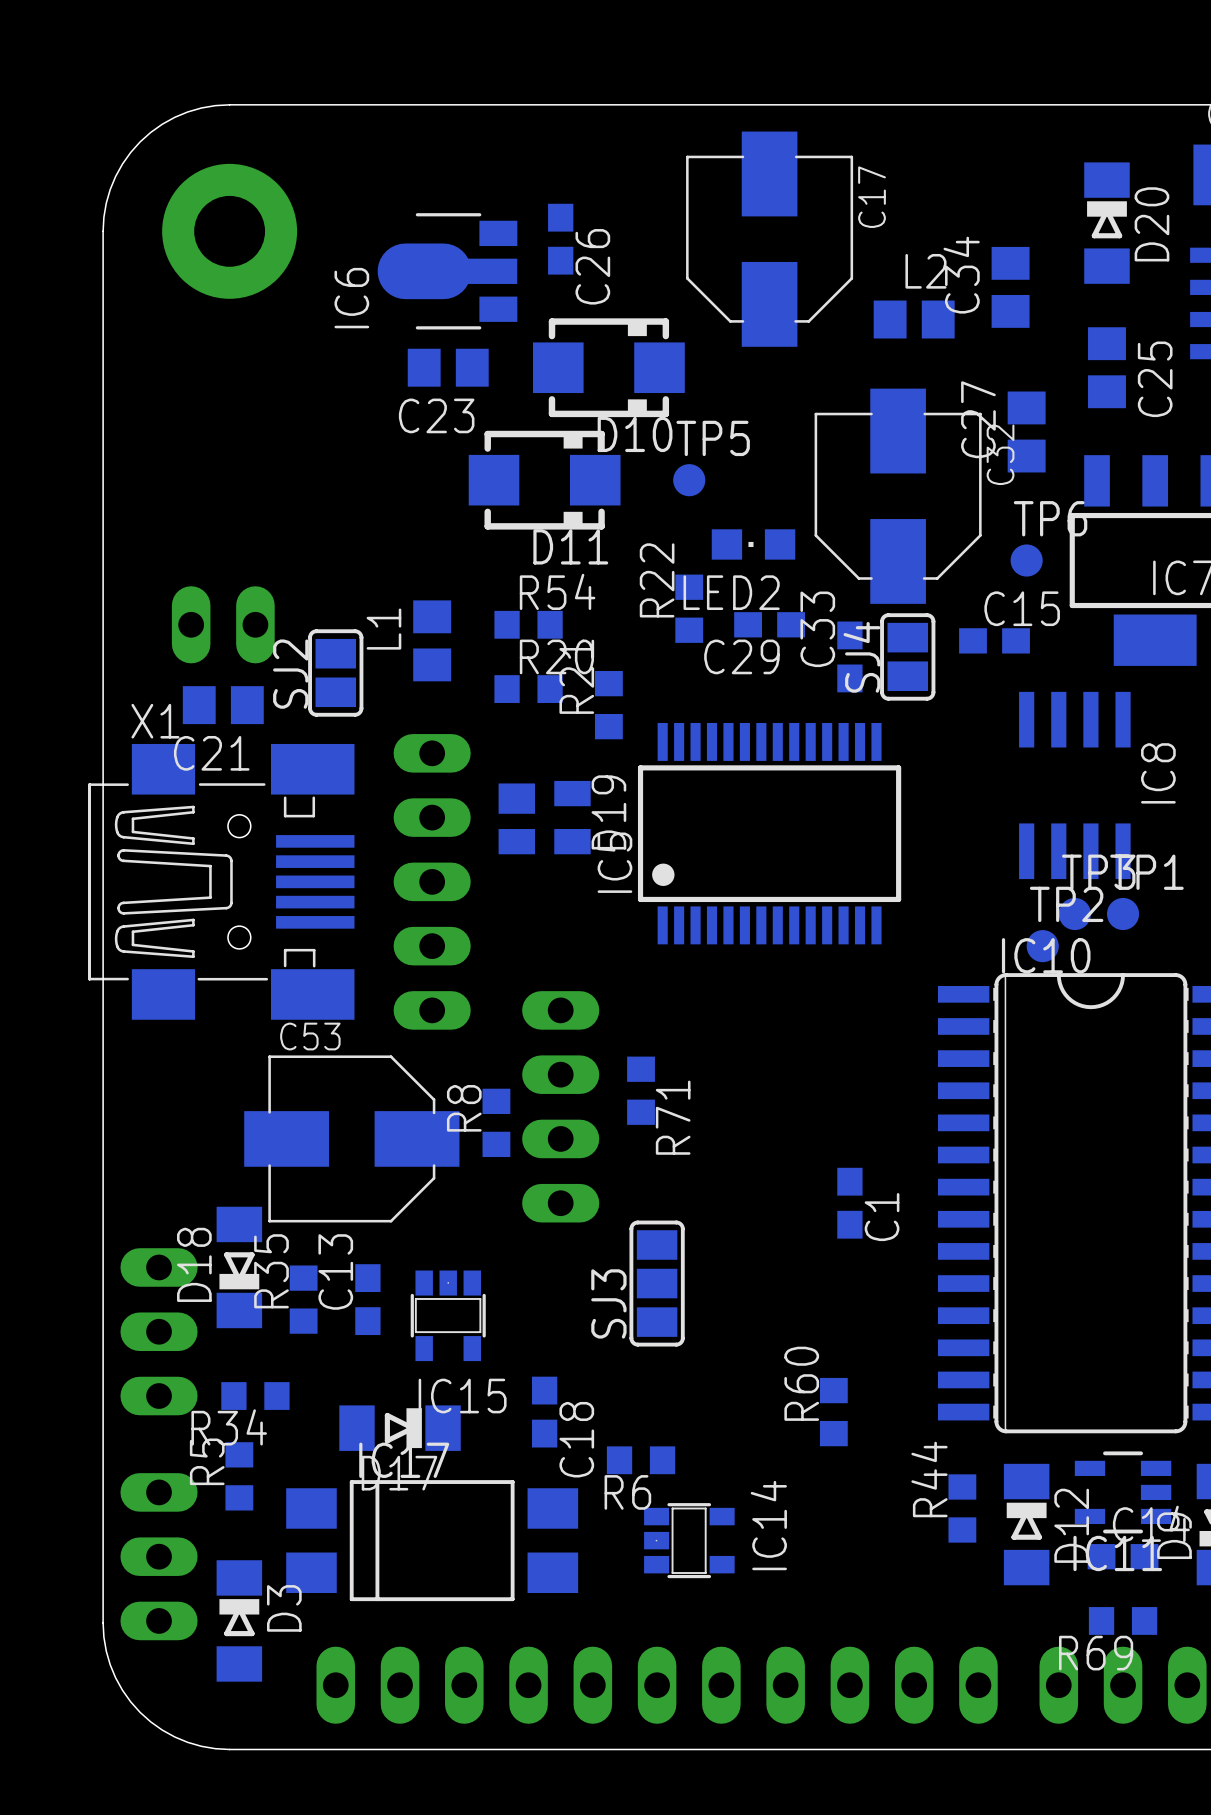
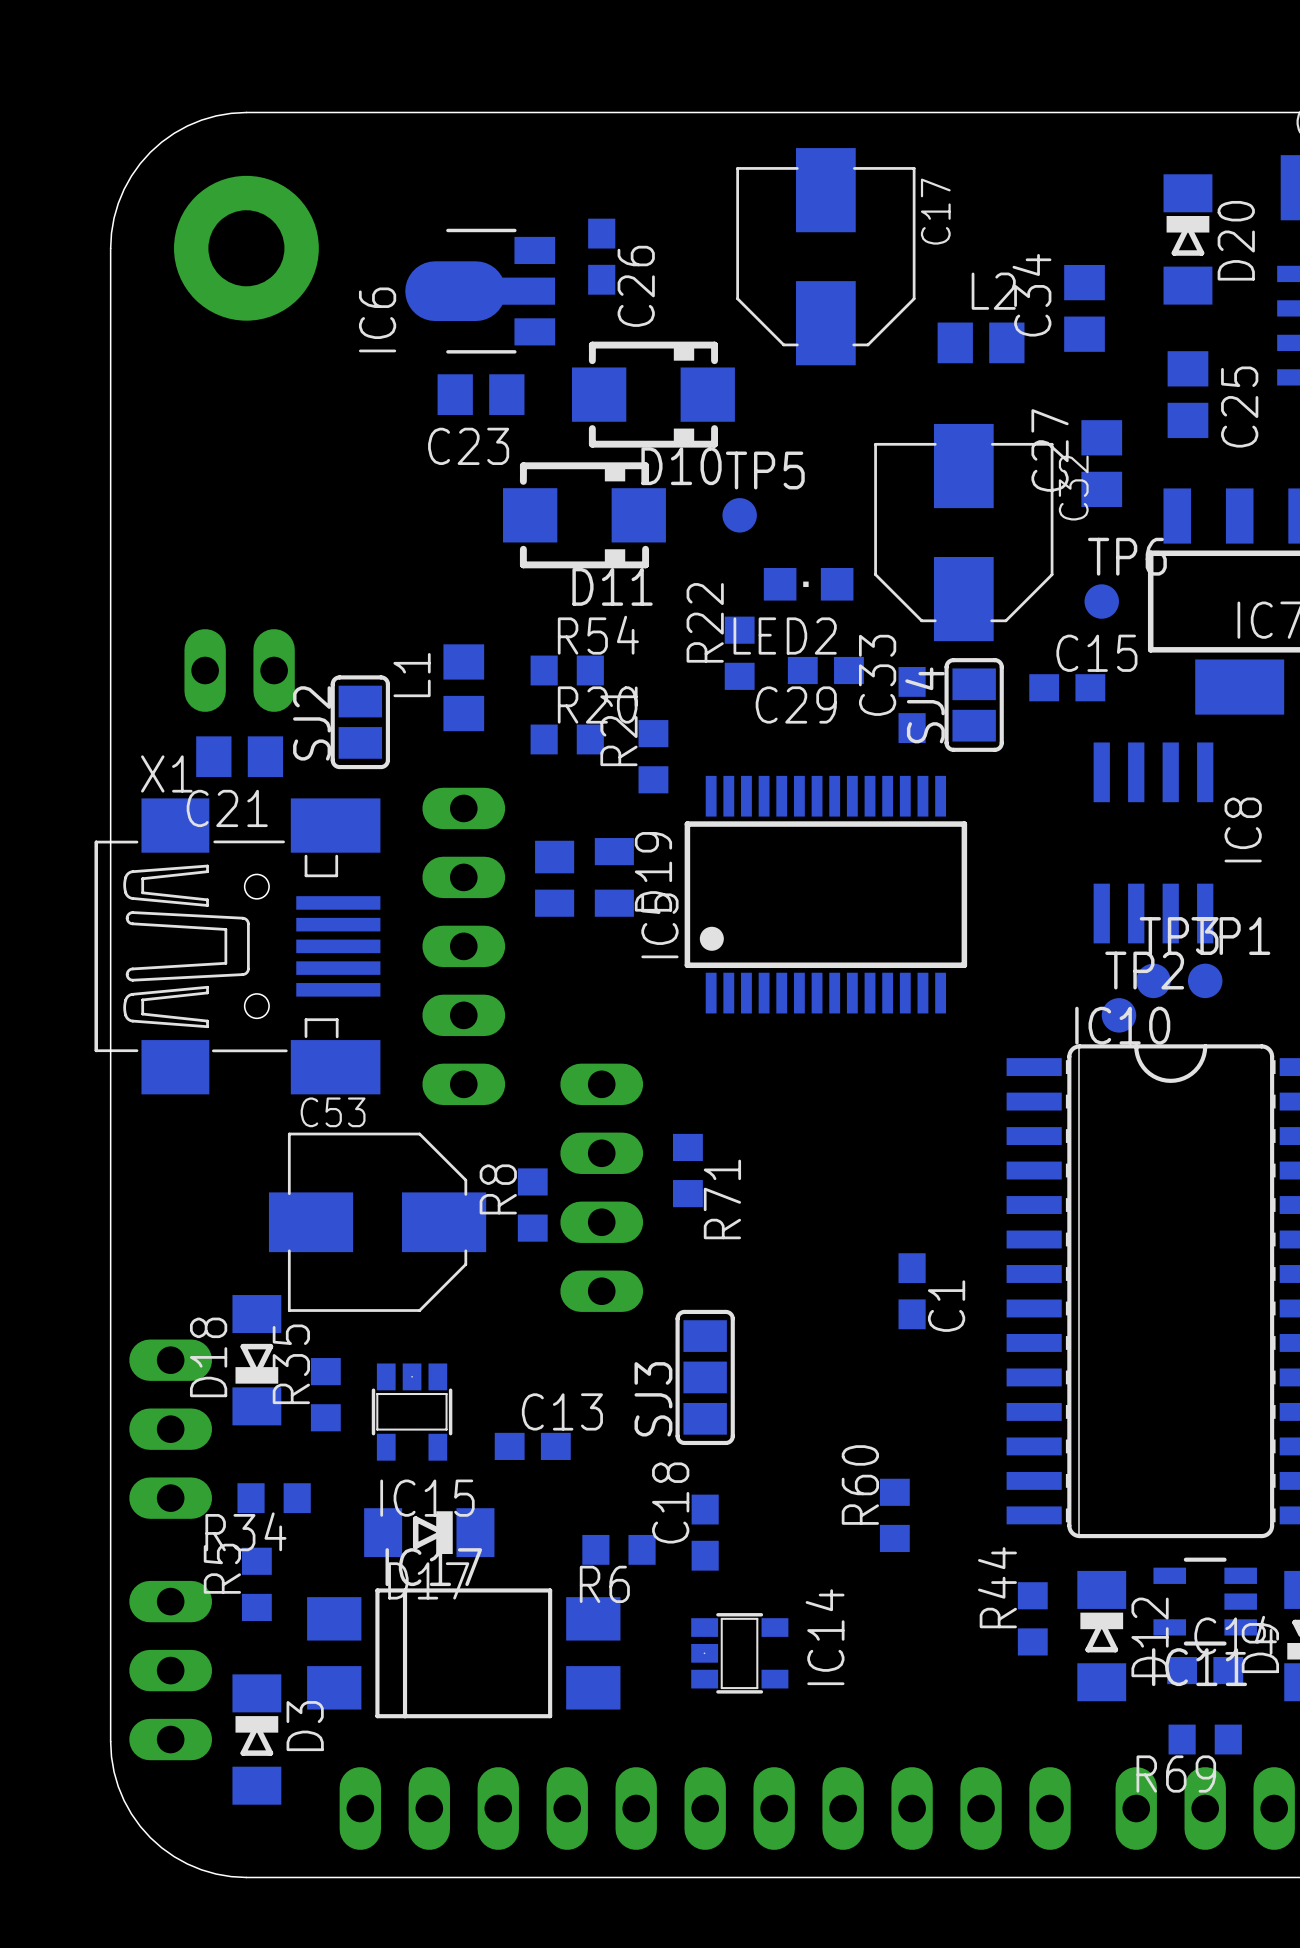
C17 footprint: [686, 131, 854, 347] -> [736, 148, 916, 366]
C32 footprint: [814, 388, 982, 604] -> [874, 423, 1054, 642]
C53 footprint: [244, 1055, 460, 1223] -> [268, 1132, 487, 1312]
C13 rotation: 0° (367, 1299) -> 90° clockwise (532, 1446)
C13 position: (367, 1299) -> (532, 1446)
IC15 position: (448, 1315) -> (412, 1412)
C18 position: (544, 1412) -> (705, 1532)
C18 name position: C18 (576, 1439) -> C18 (670, 1502)
R6 position: (641, 1460) -> (618, 1549)

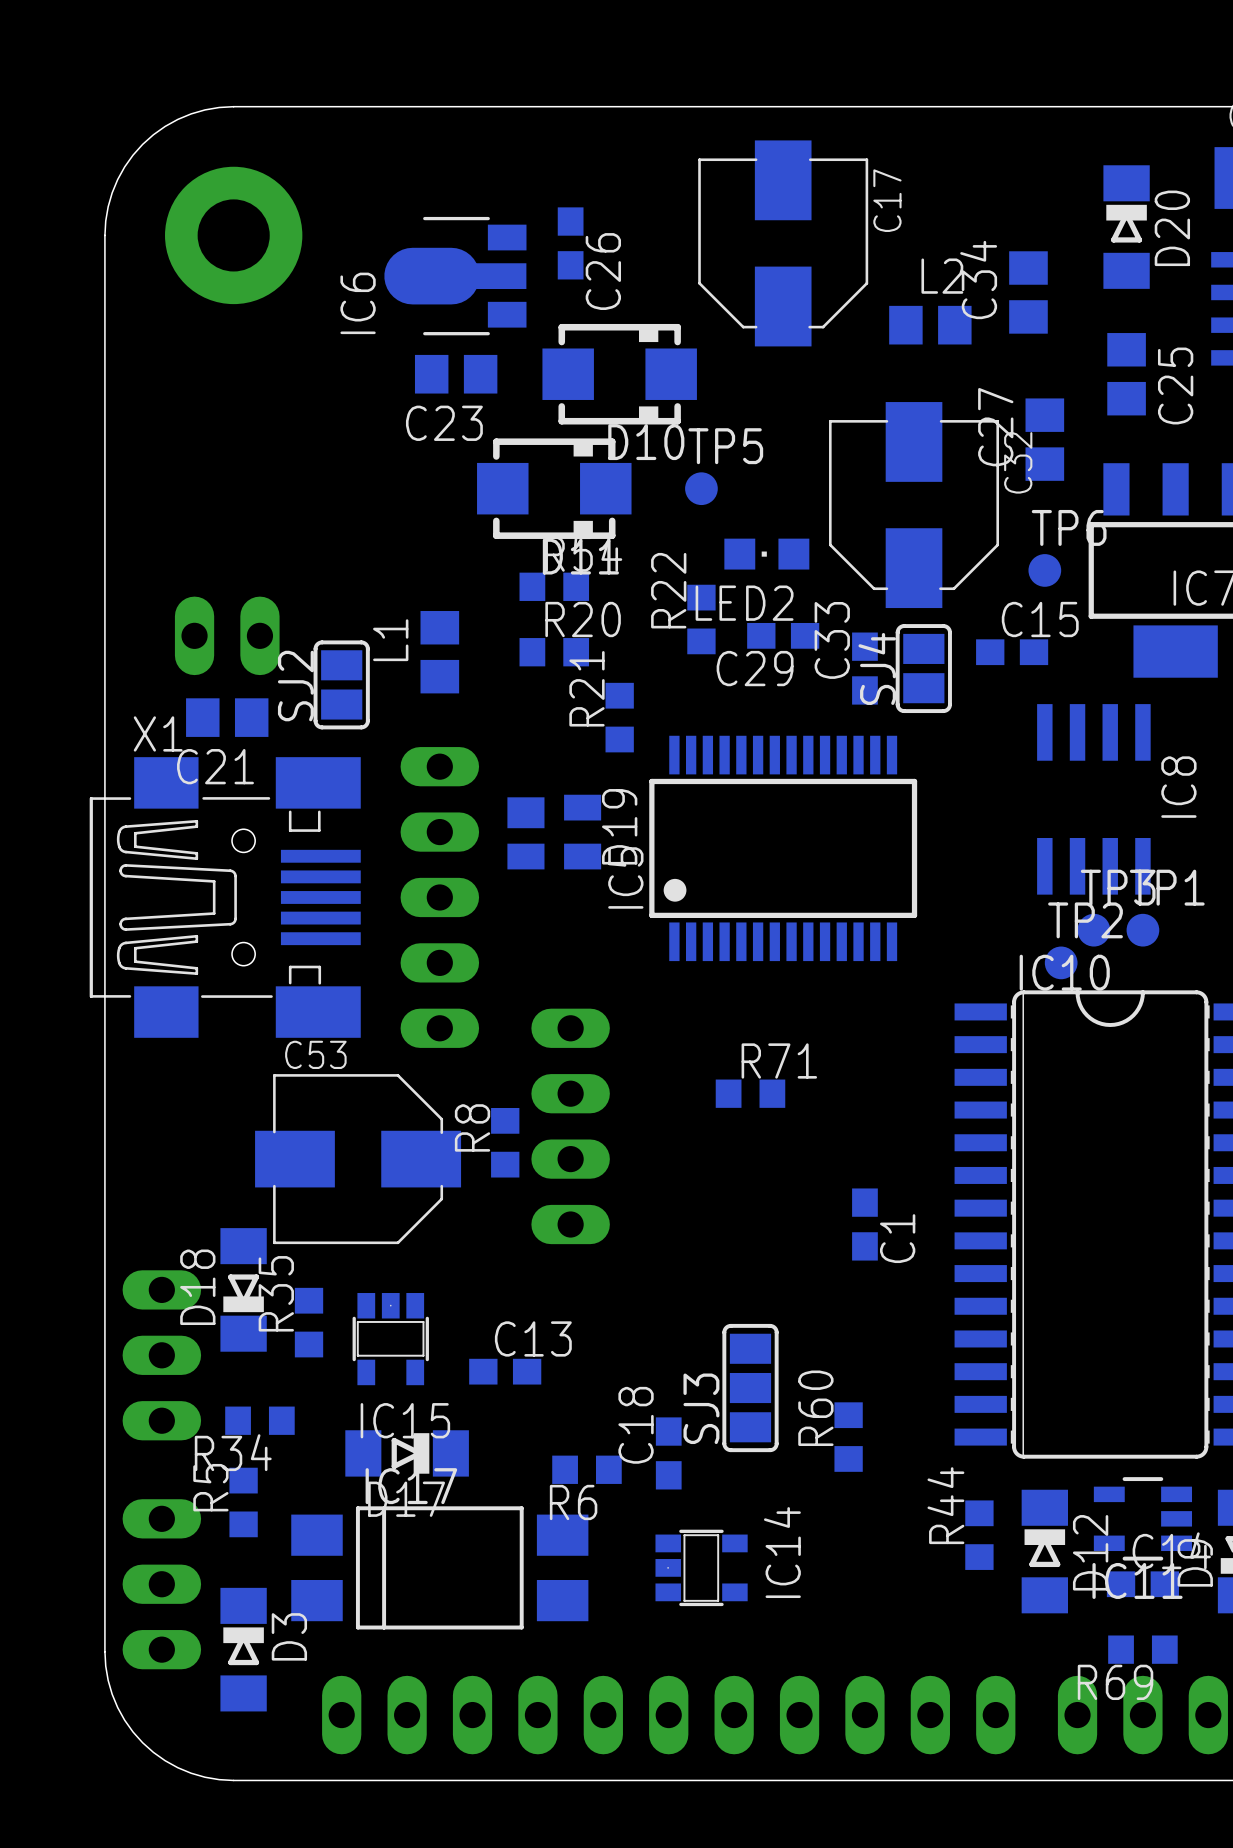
R54 position: (567, 670) -> (554, 586)
R20 position: (567, 739) -> (554, 652)
R71 rotation: 0° (687, 1170) -> 90° clockwise (750, 1093)
R71 position: (687, 1170) -> (750, 1093)
R71 name position: R71 (722, 1199) -> R71 (779, 1060)
SJ3 position: (705, 1377) -> (750, 1388)

